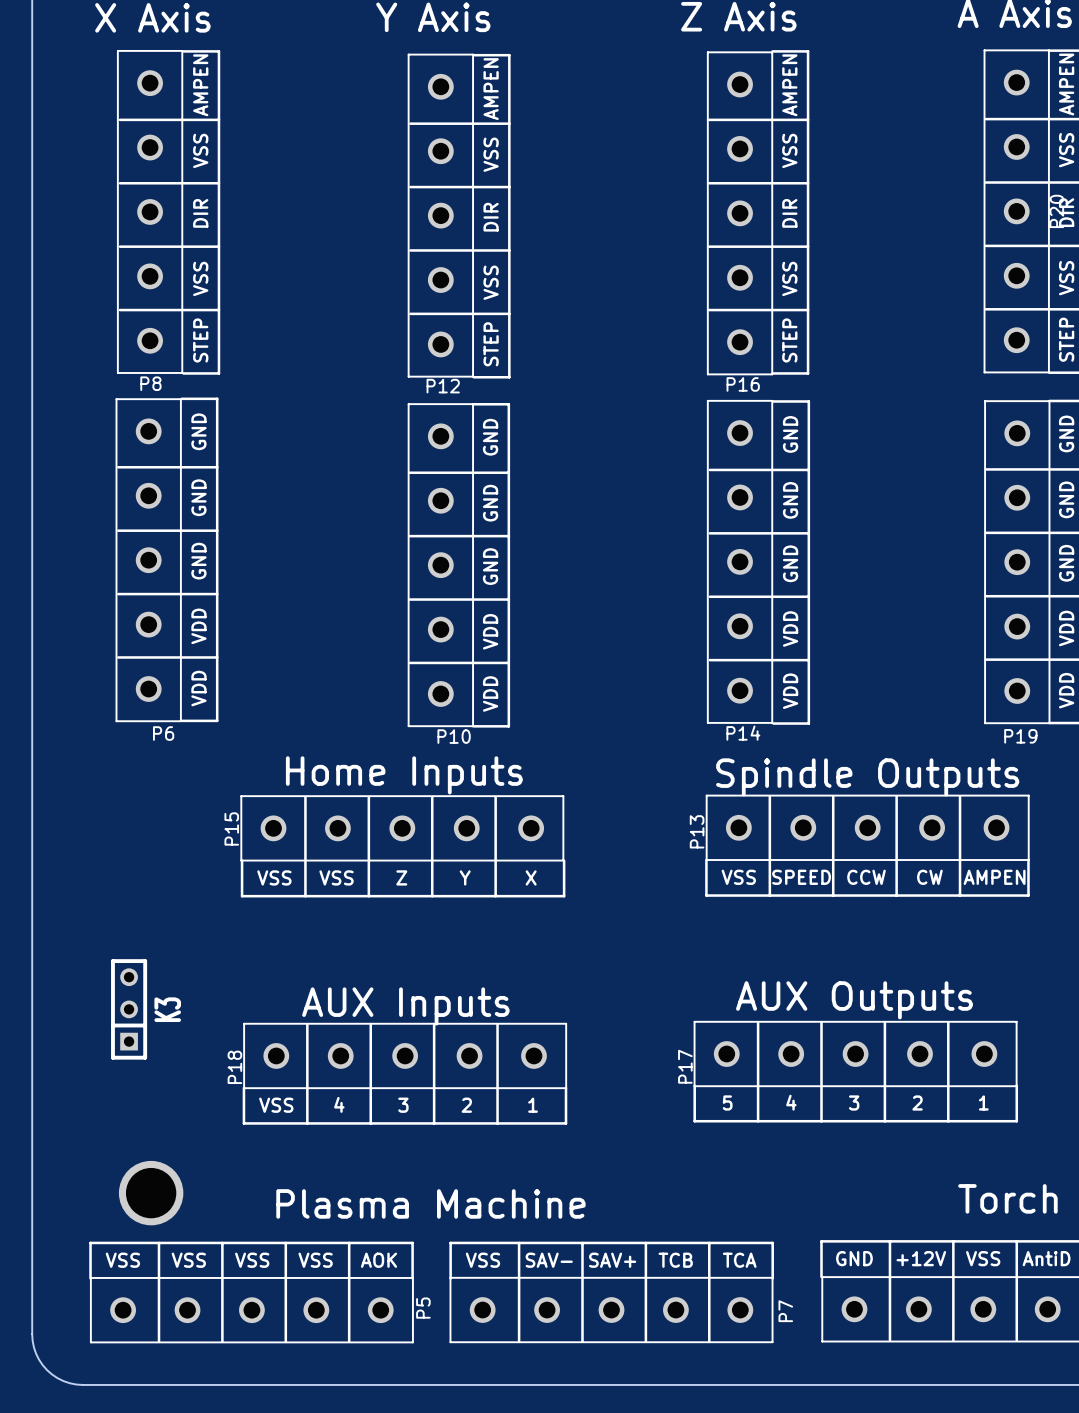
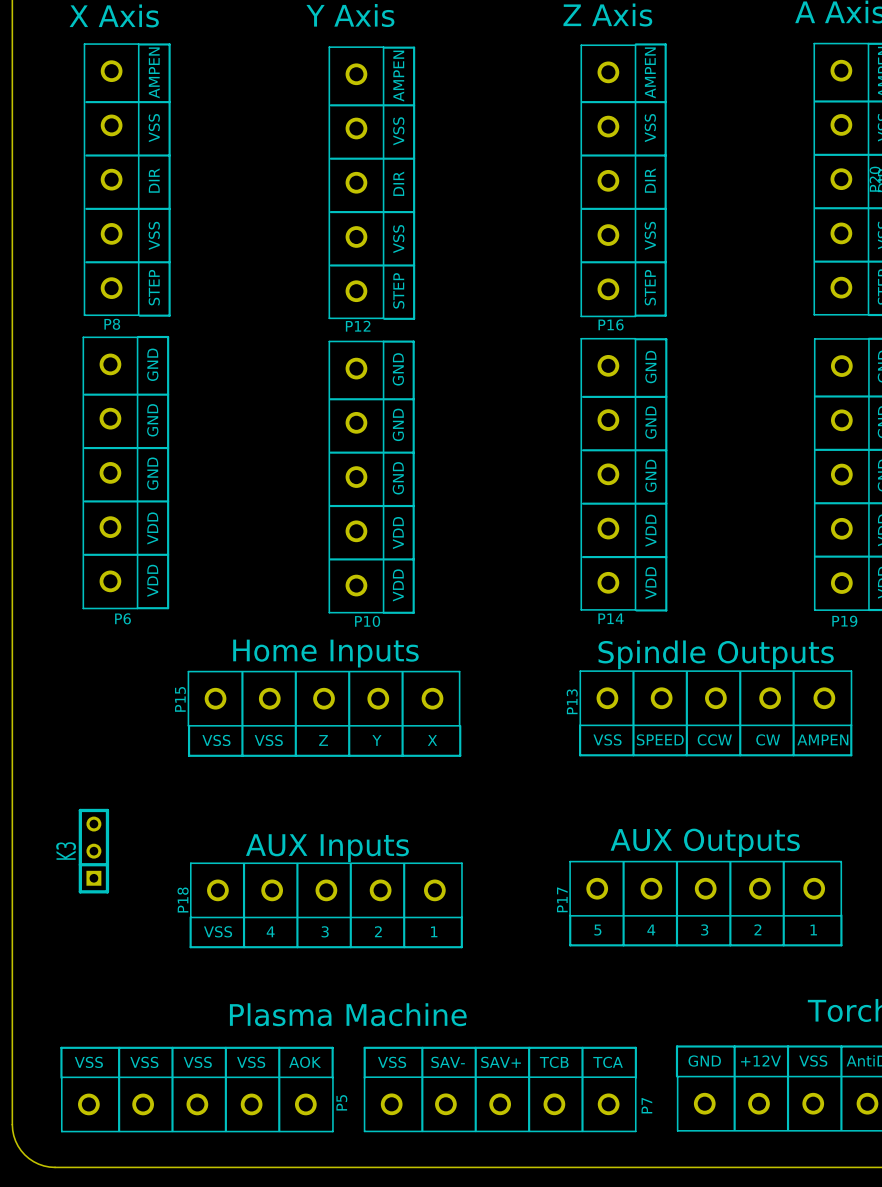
K3 name position: K3 (167, 1009) -> K3 (66, 851)
part: (151, 1193) -> none

